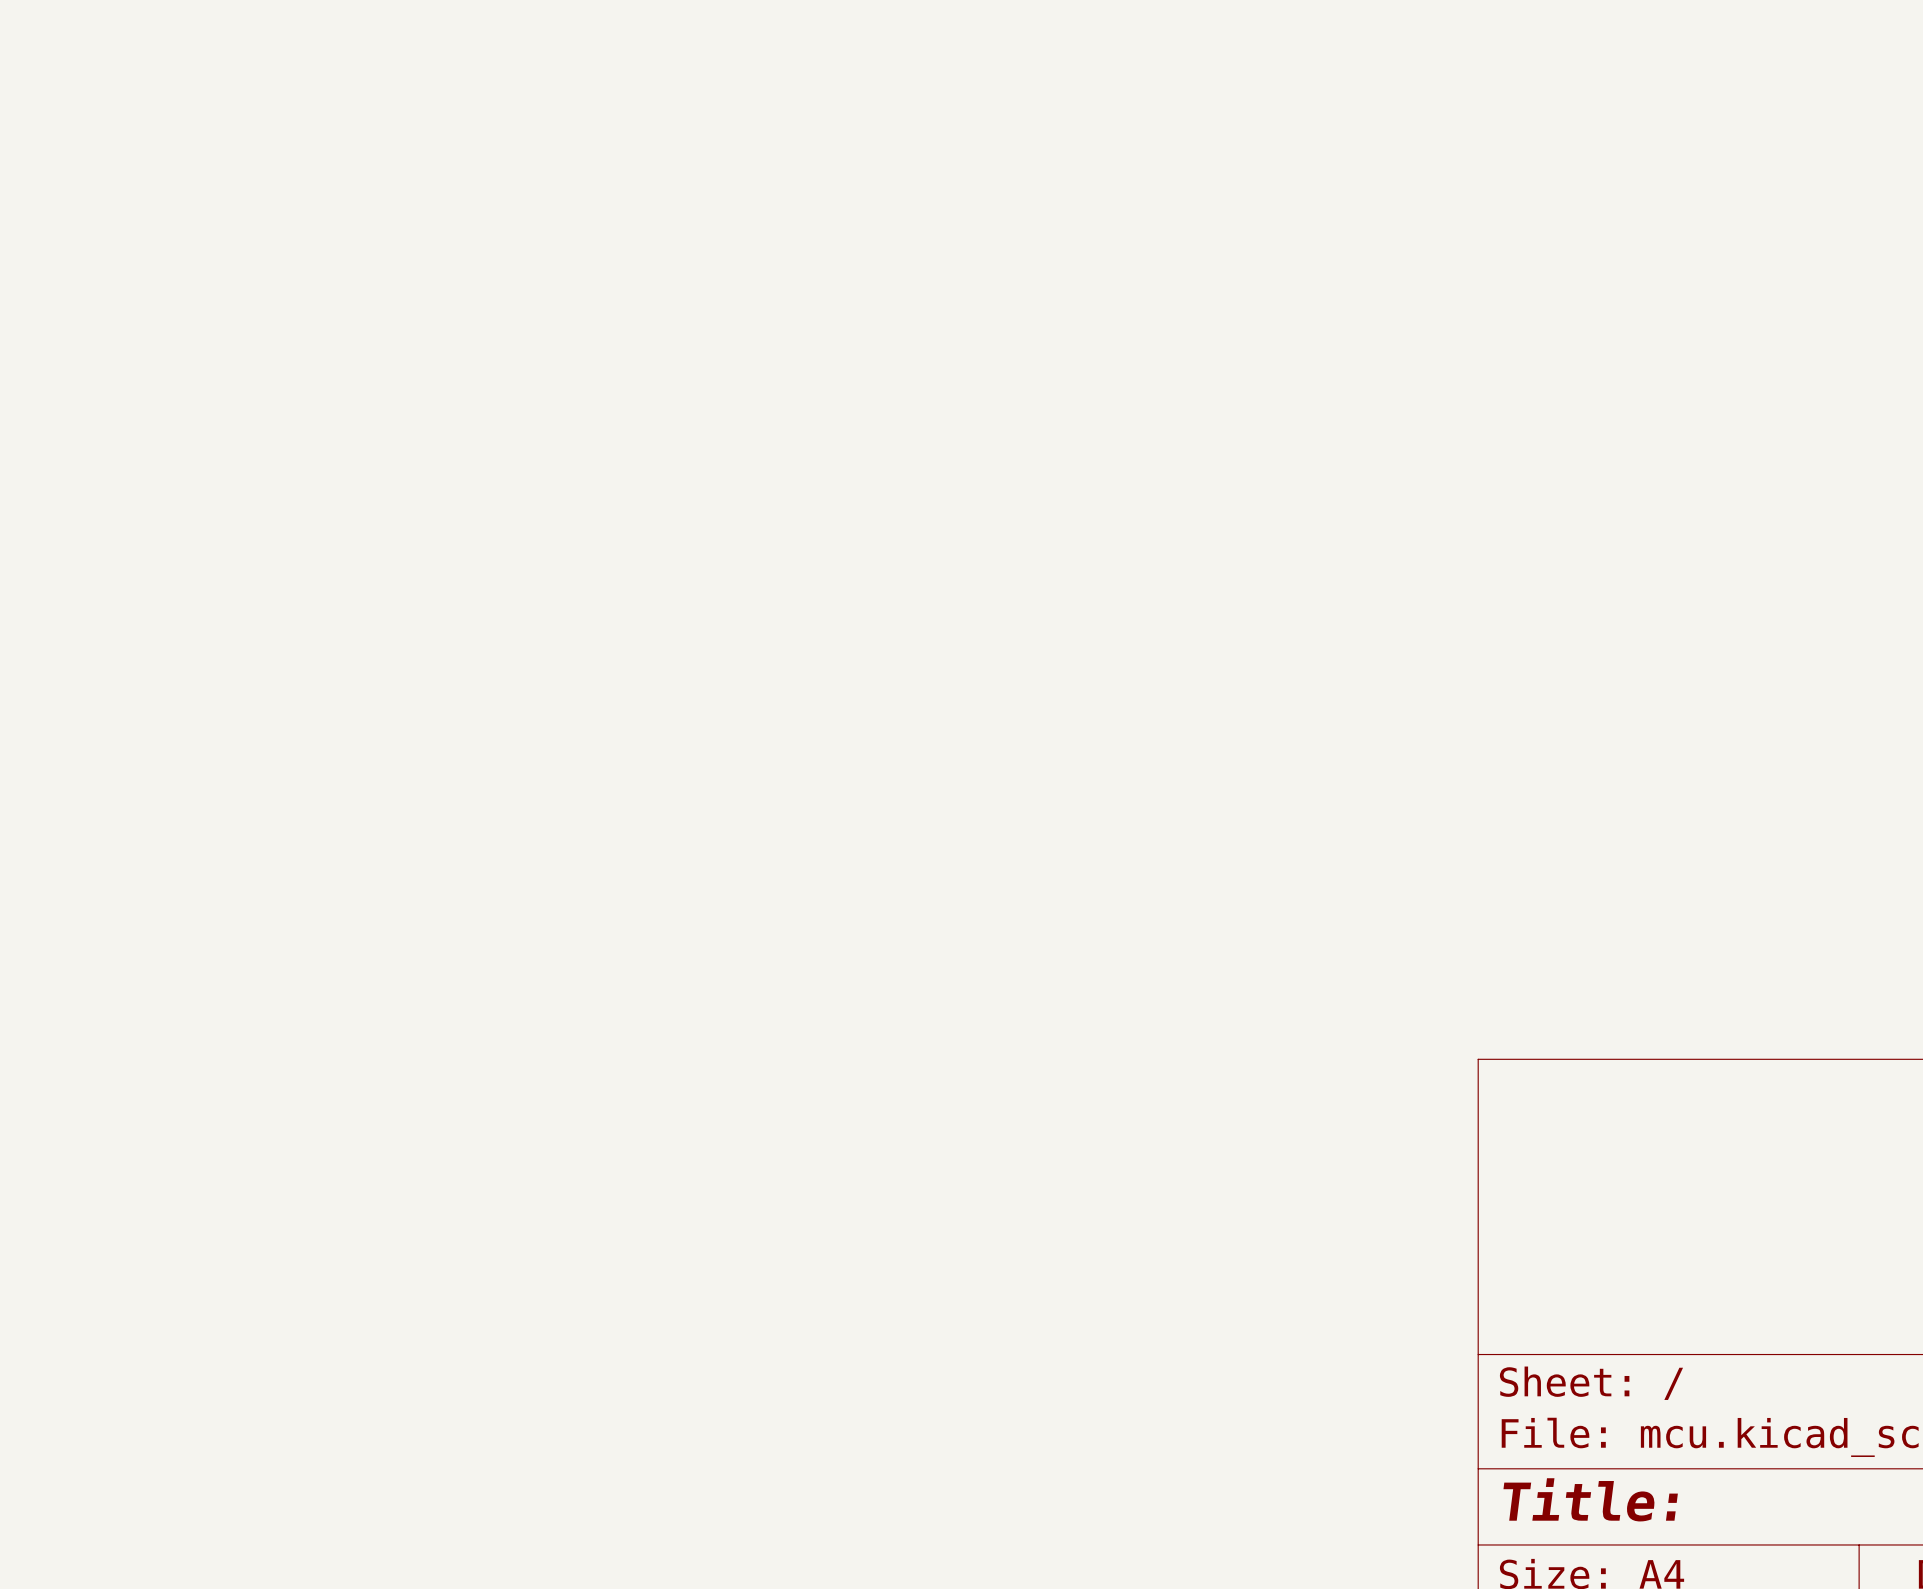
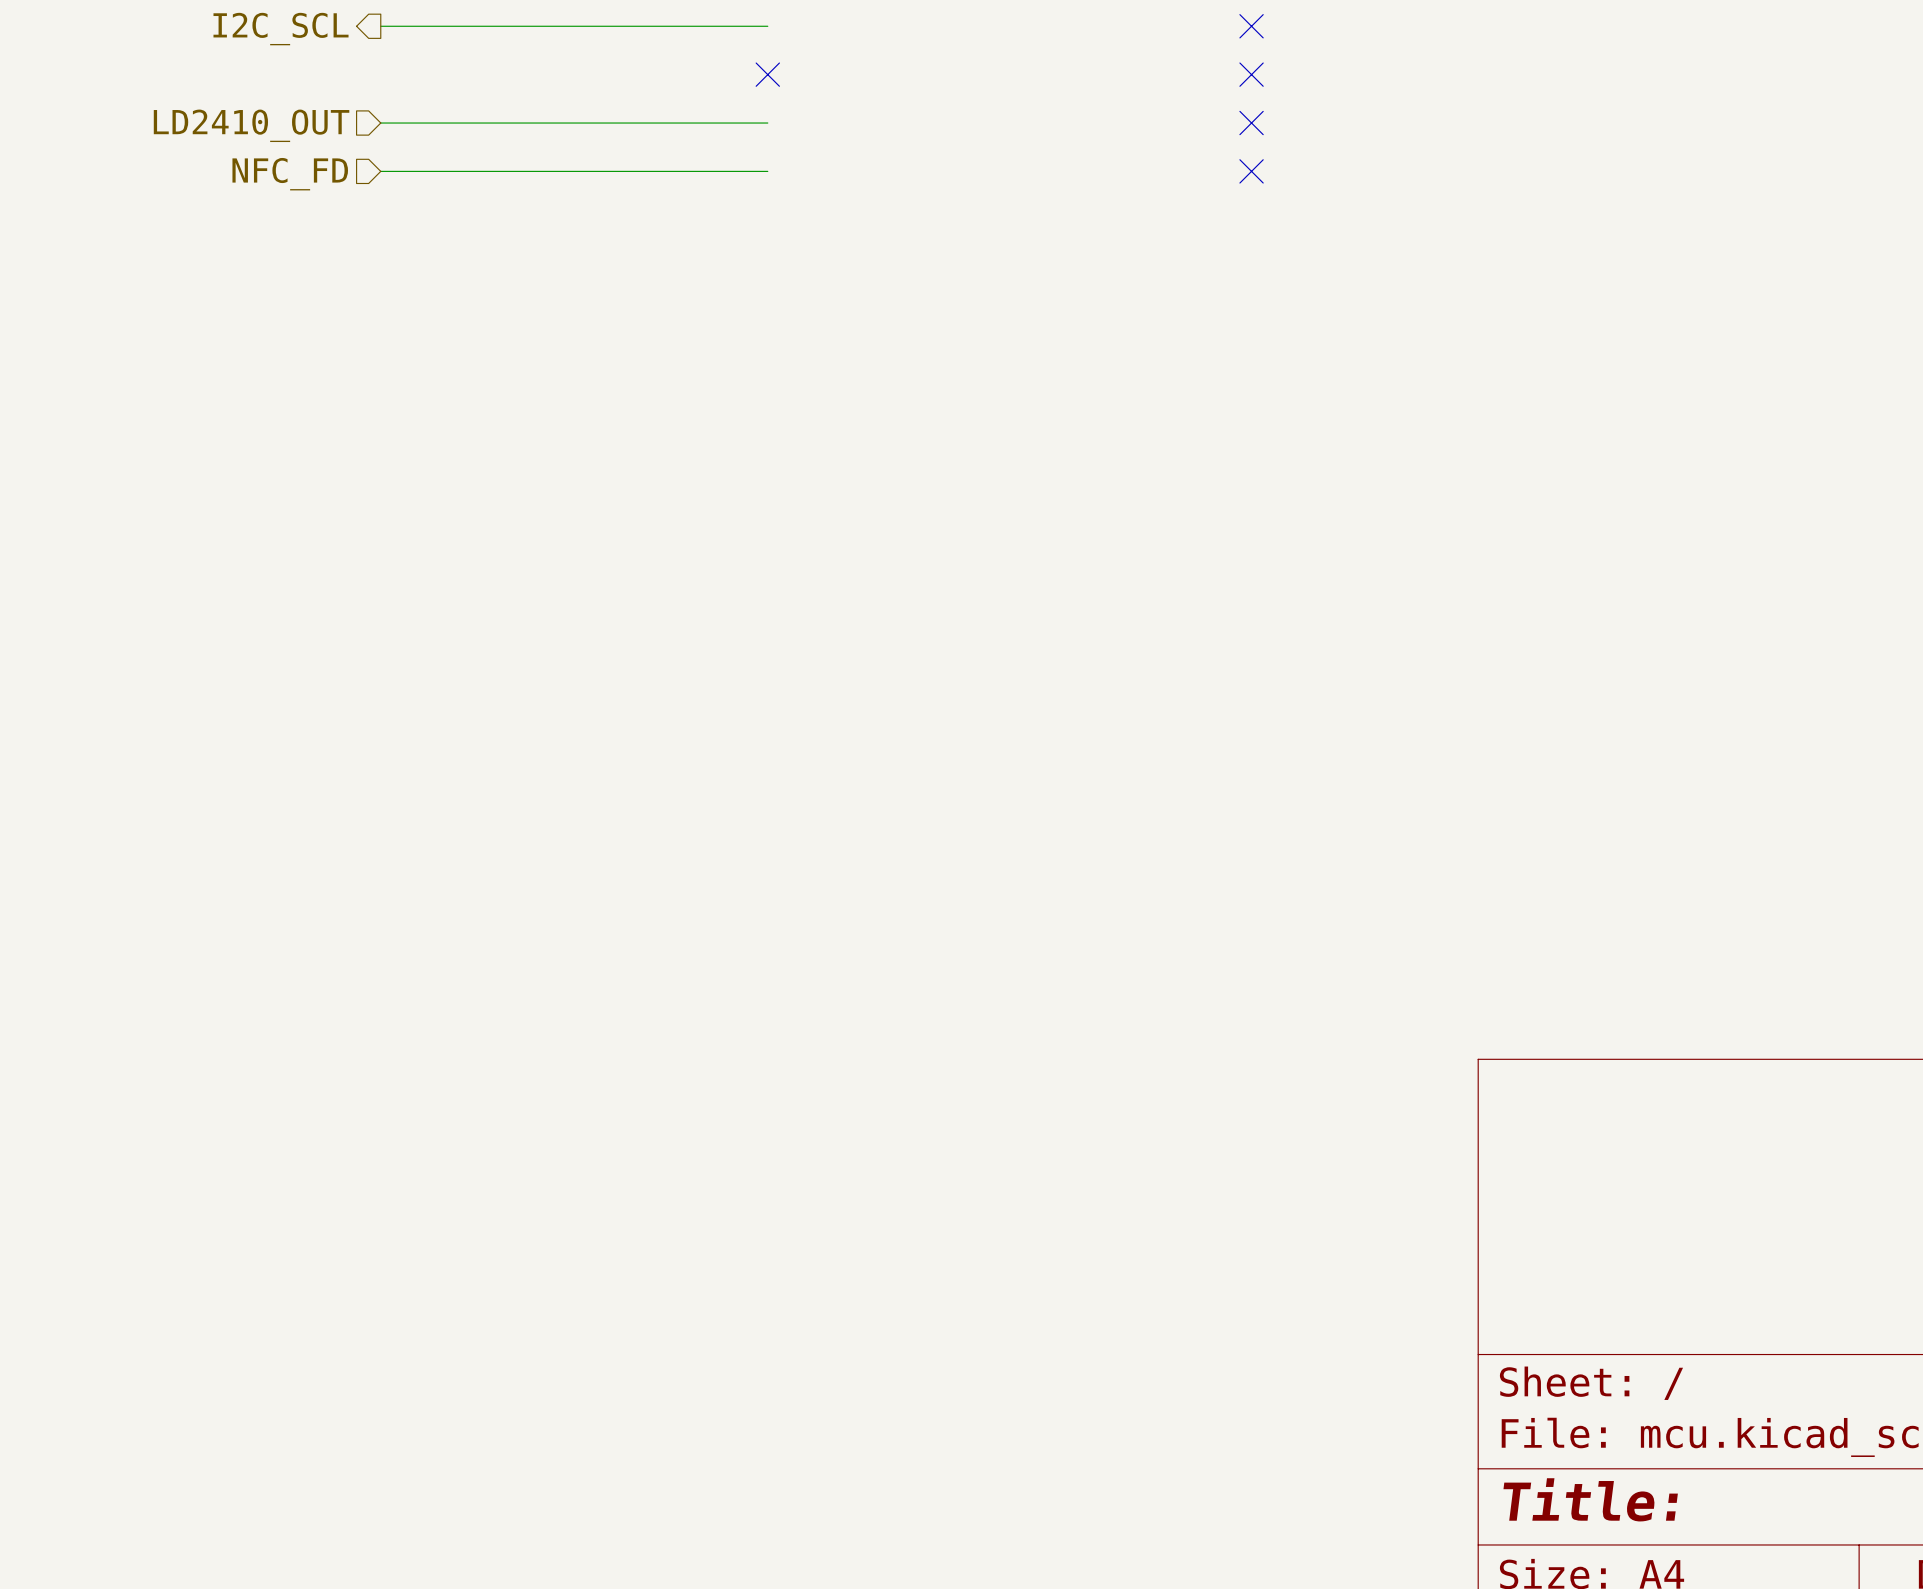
wire: none -> (380, 26) (767, 26)
no-connect mark: none -> (1251, 26)
hierarchical label: none -> I2C_SCL (281, 29)
no-connect mark: none -> (767, 74)
no-connect mark: none -> (1251, 74)
wire: none -> (380, 123) (767, 123)
no-connect mark: none -> (1251, 123)
hierarchical label: none -> LD2410_OUT (251, 125)
wire: none -> (380, 171) (767, 171)
no-connect mark: none -> (1251, 171)
hierarchical label: none -> NFC_FD (290, 174)

